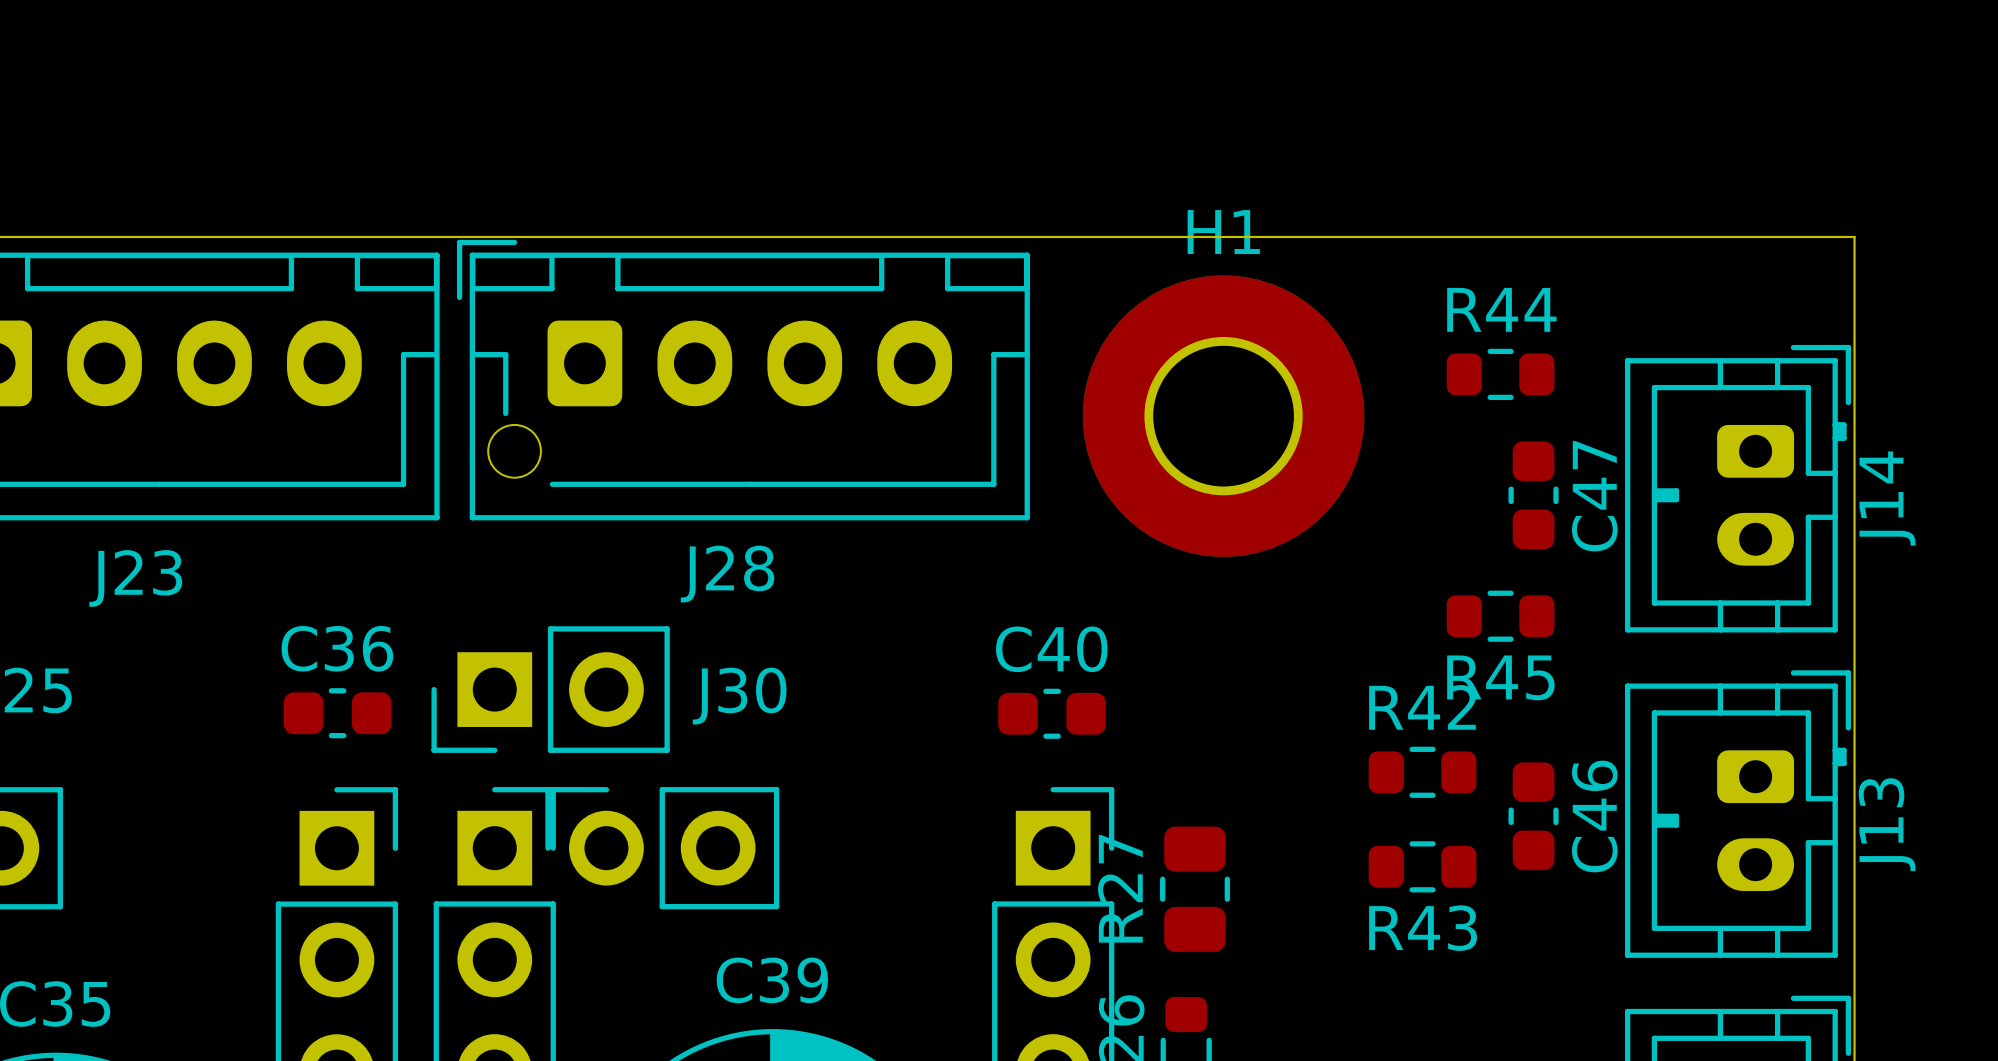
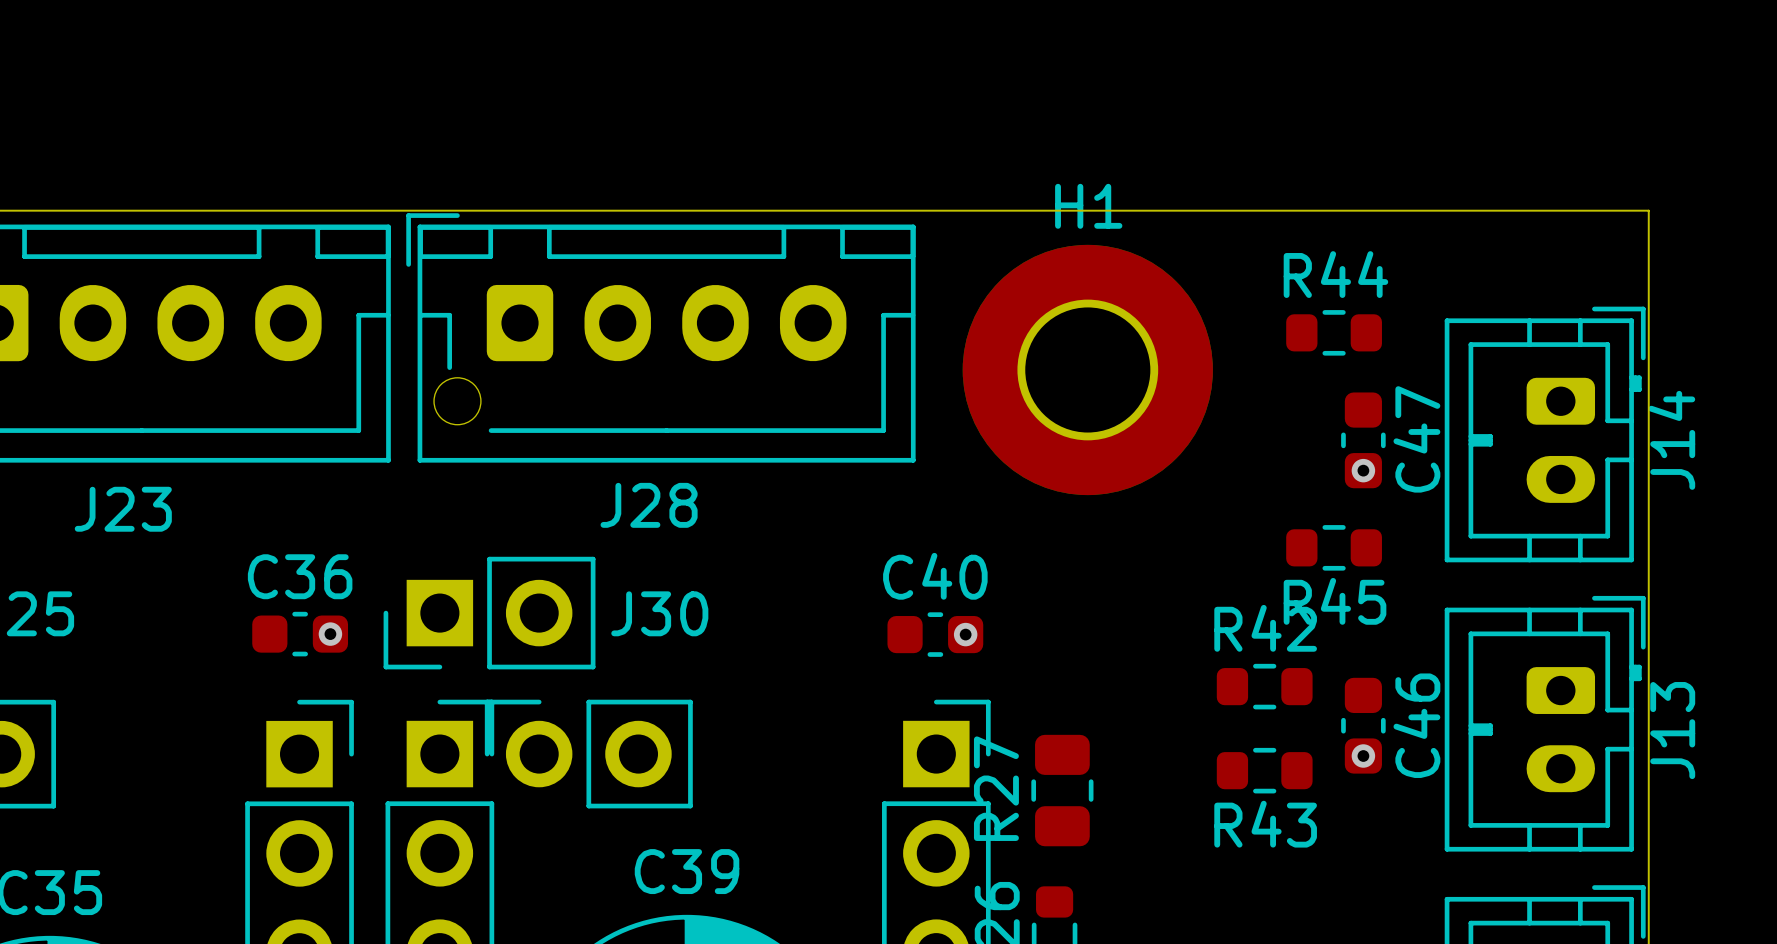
via: none -> (1363, 470)
via: none -> (330, 634)
via: none -> (965, 634)
via: none -> (1363, 756)

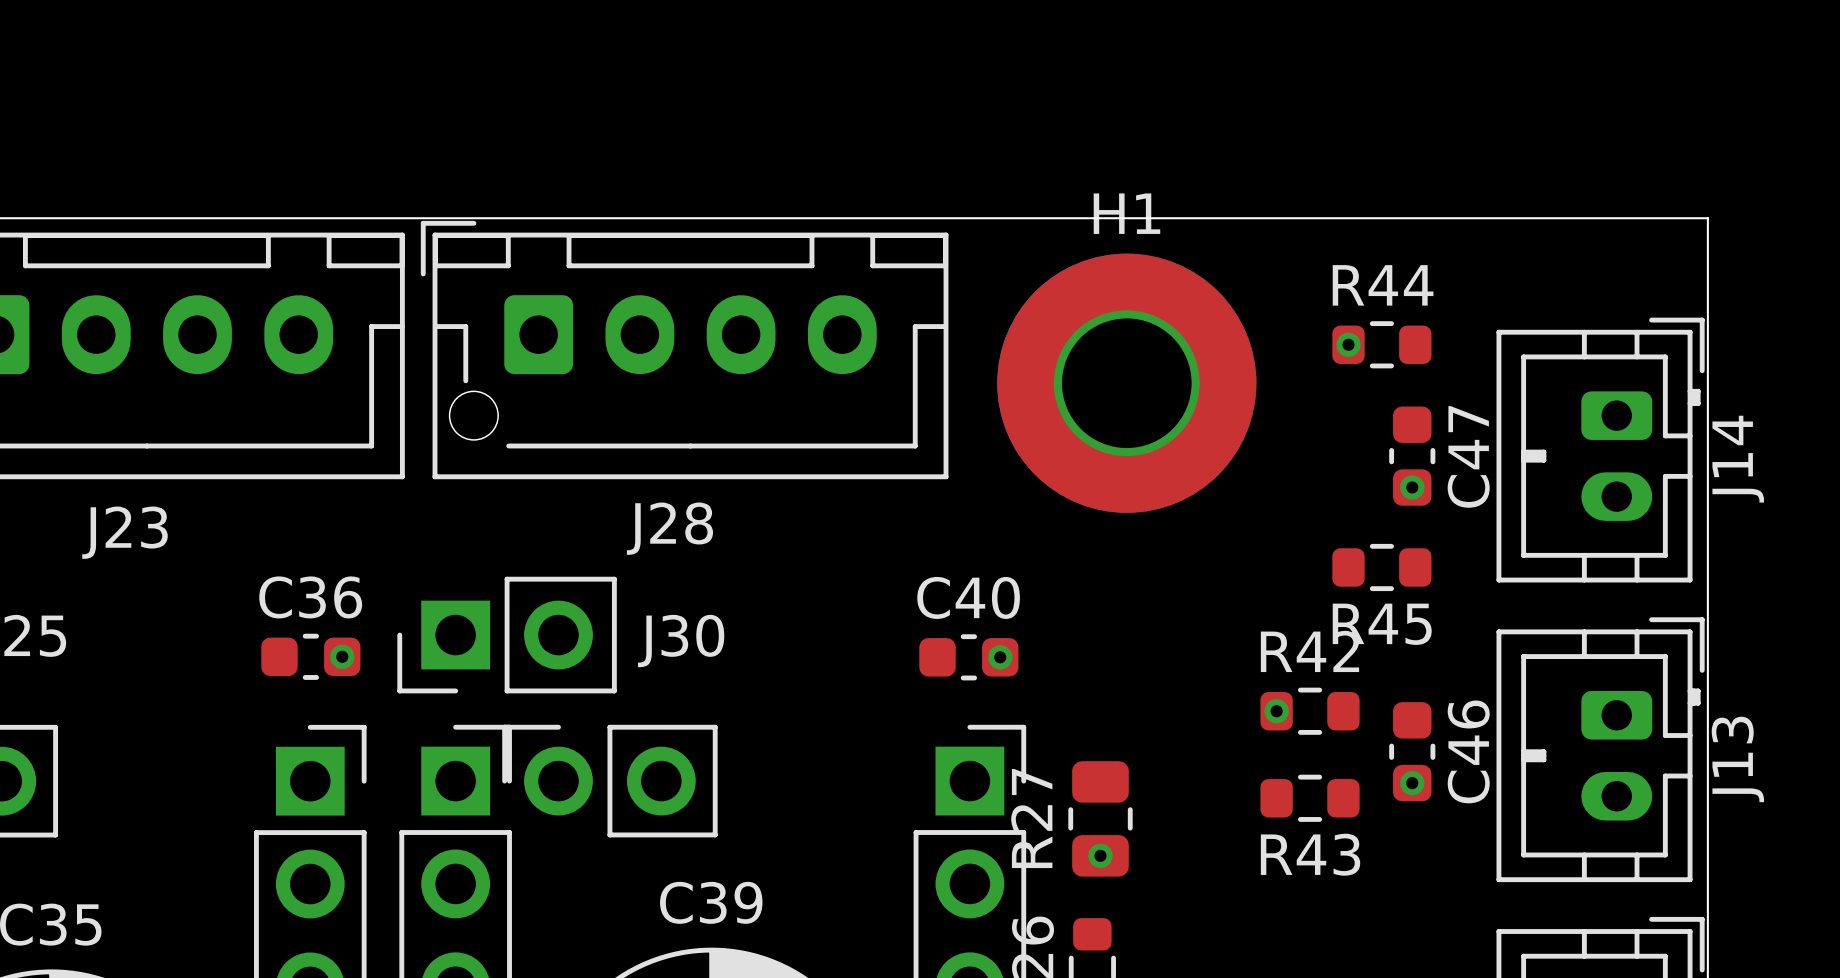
via: none -> (1348, 344)
via: none -> (1276, 711)
via: none -> (1100, 855)

